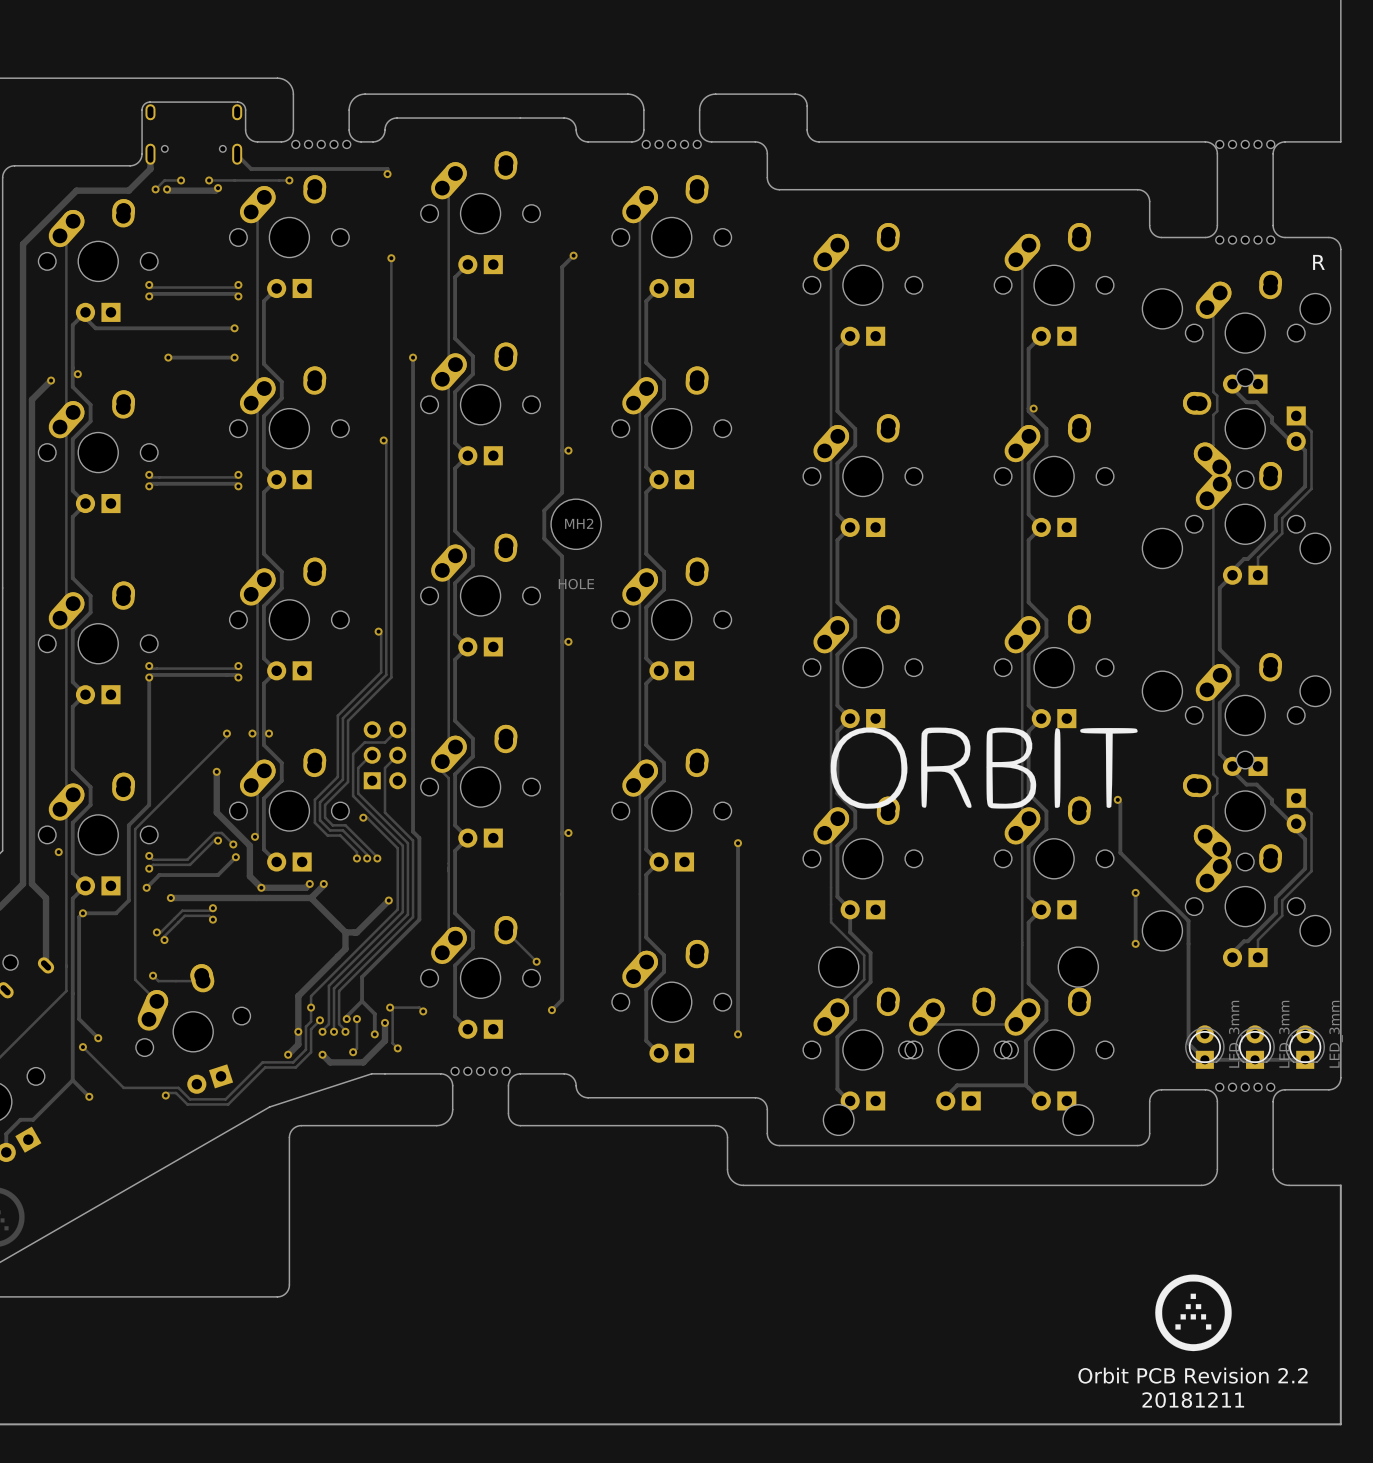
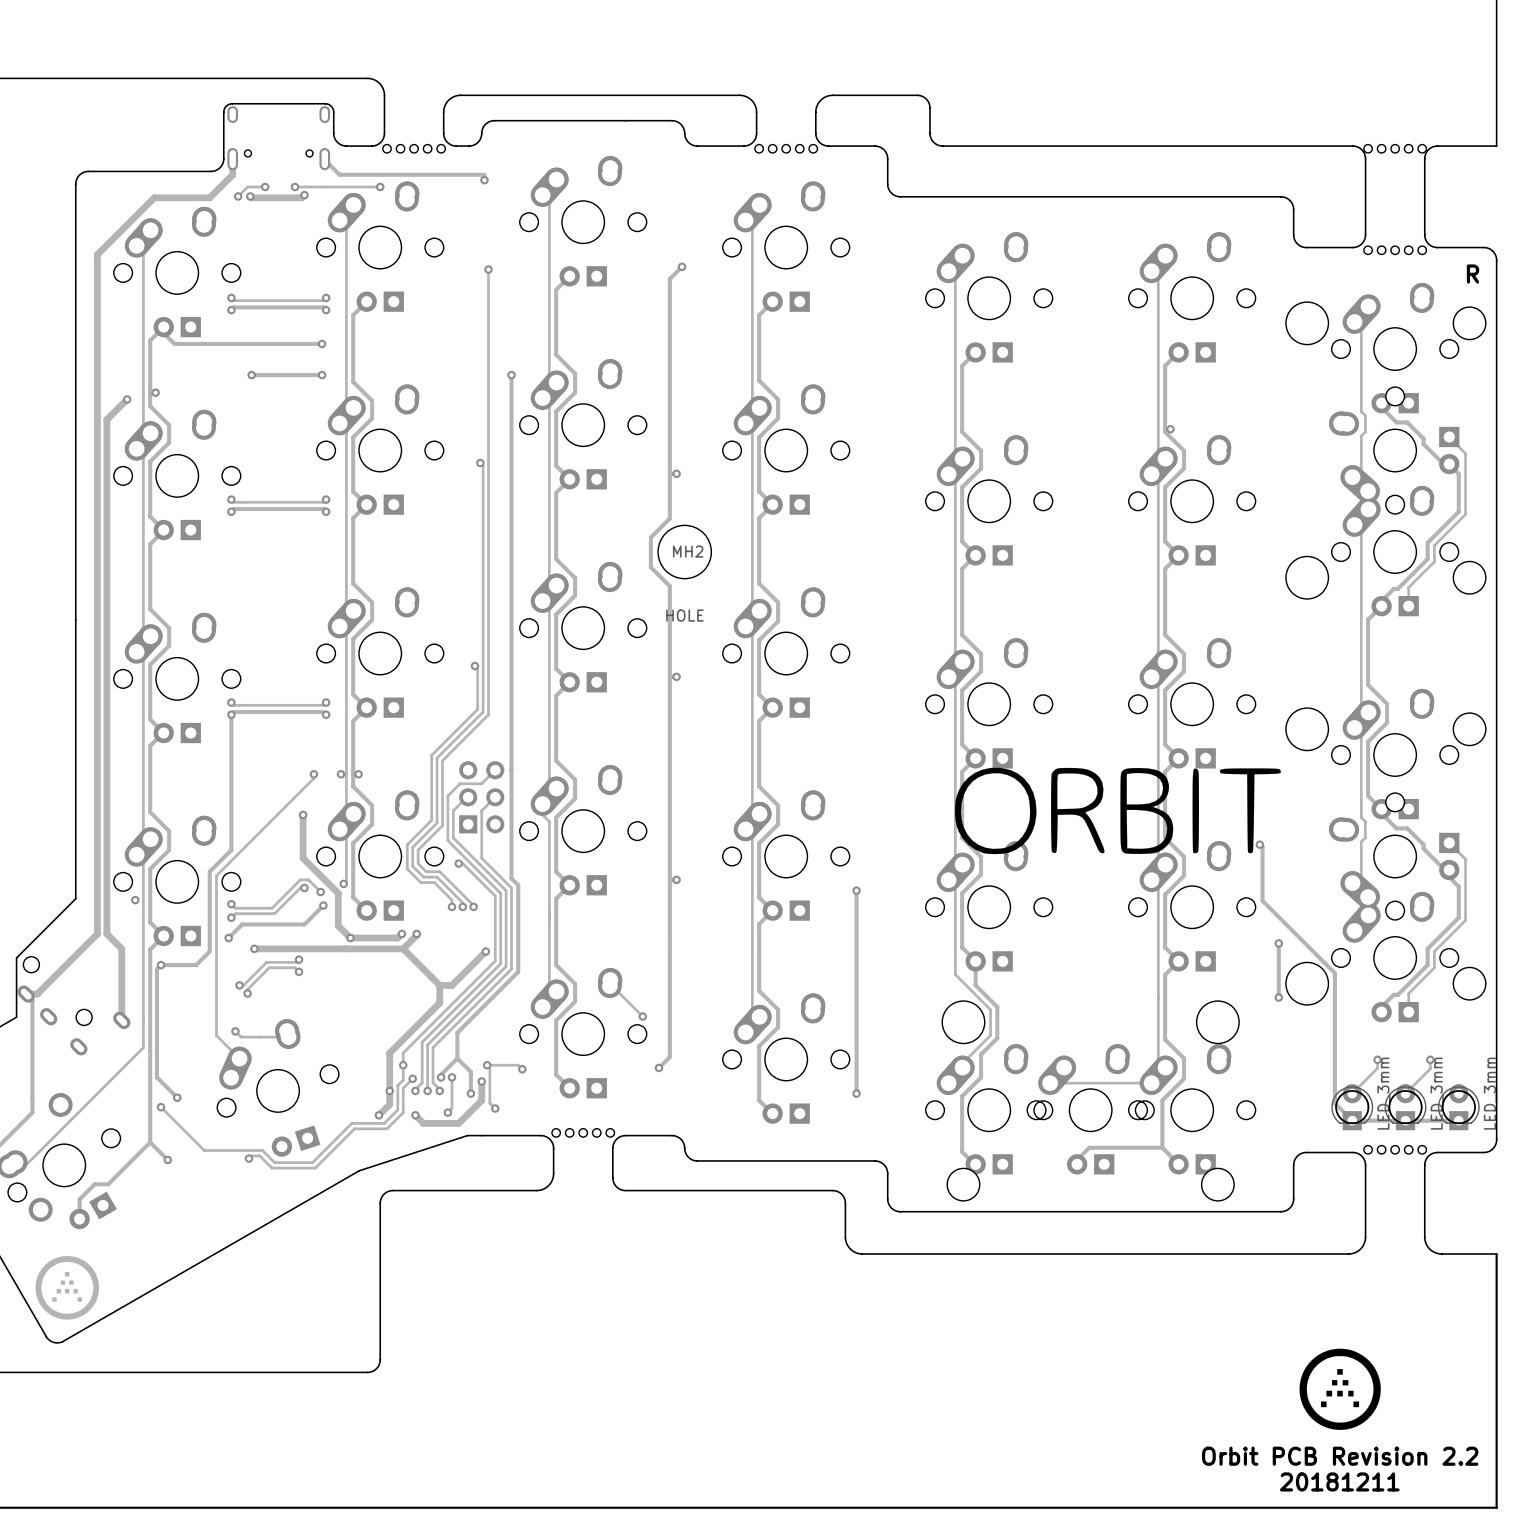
track: none -> (1377, 1059) (1377, 1068) (1352, 1093)
via: none -> (1377, 1059)
track: none -> (1430, 1059) (1430, 1068) (1405, 1093)
via: none -> (1430, 1059)

